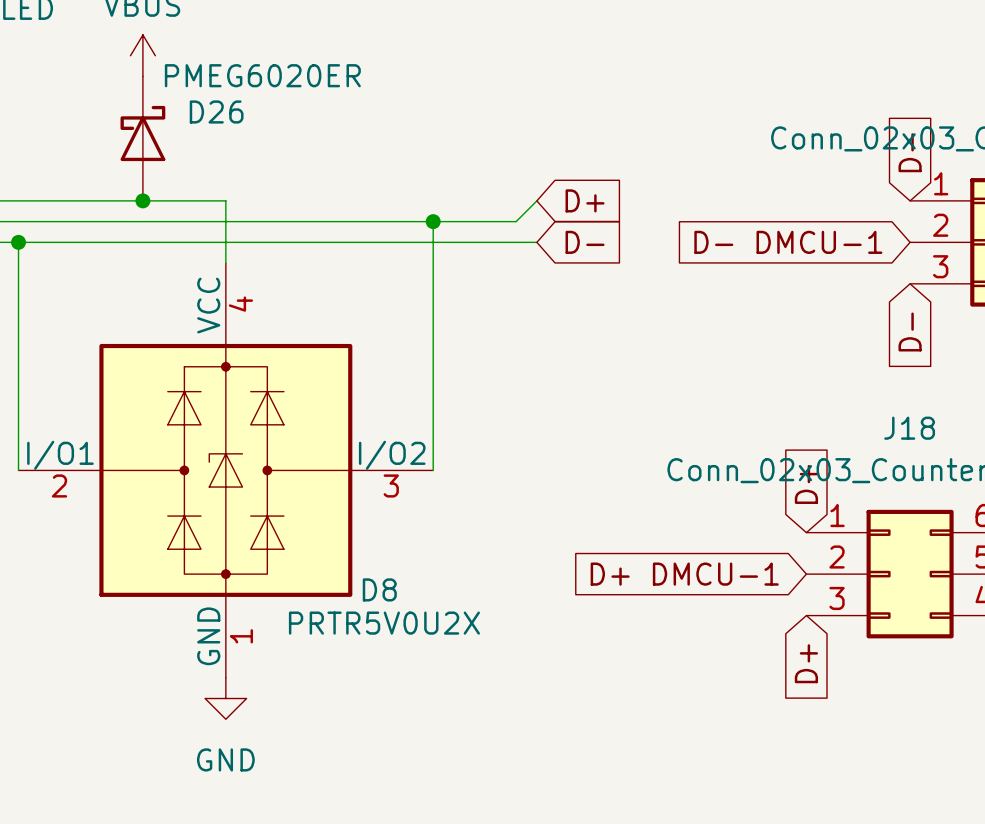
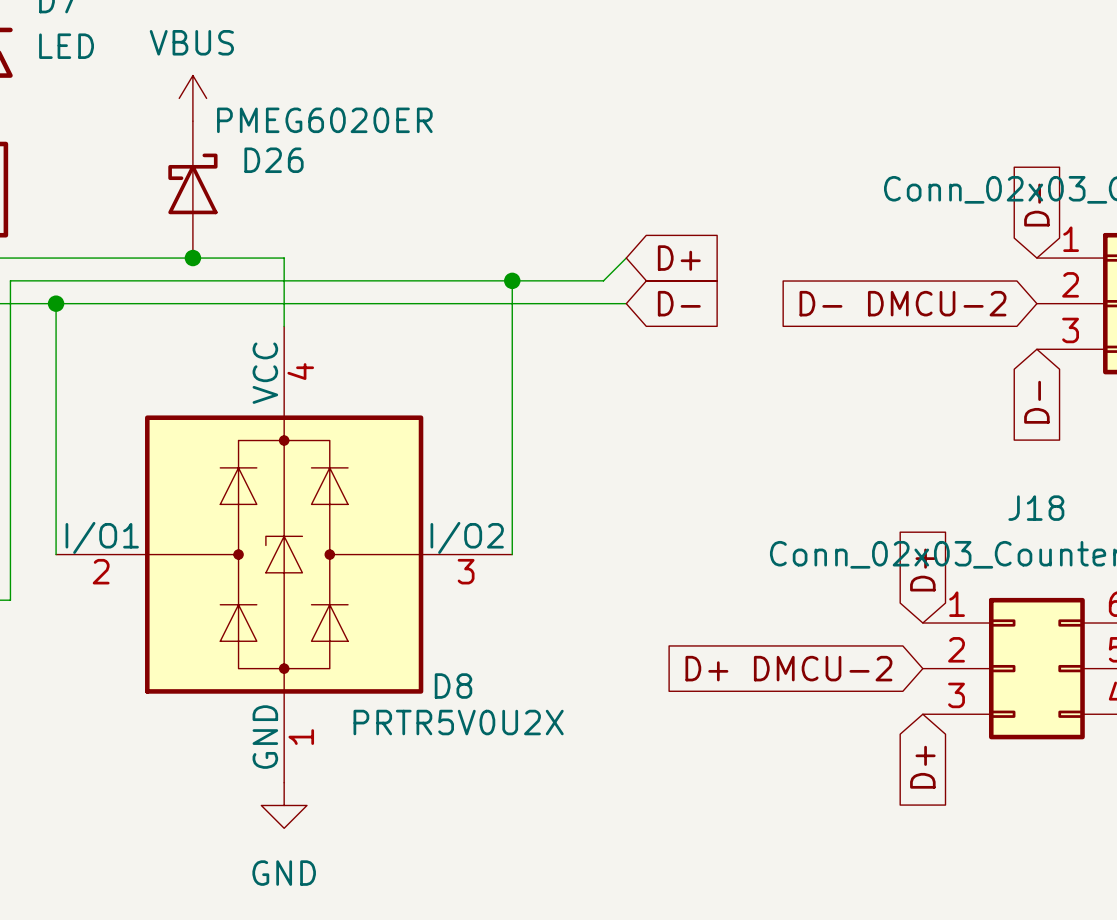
global label: D- DMCU-1 (788, 242) -> D- DMCU-2 (902, 303)
global label: D+ DMCU-1 (684, 574) -> D+ DMCU-2 (788, 668)

